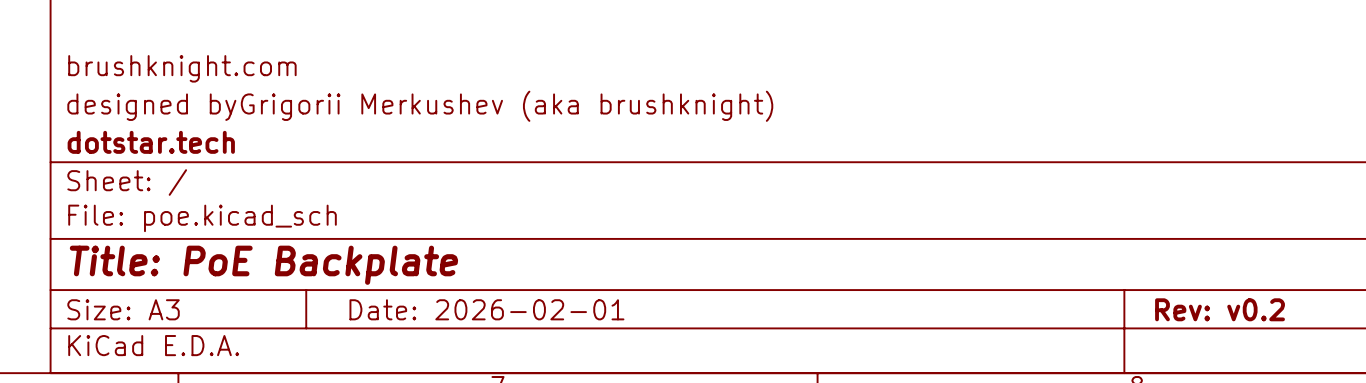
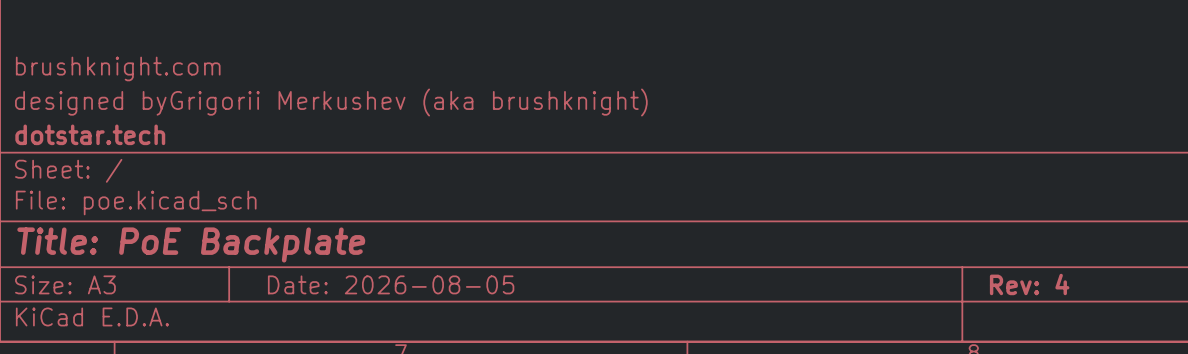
title block: Date: 2026-02-01 (486, 309) -> Date: 2026-08-05 (391, 284)
title block: Rev: v0.2 (1220, 309) -> Rev: 4 (1029, 284)

